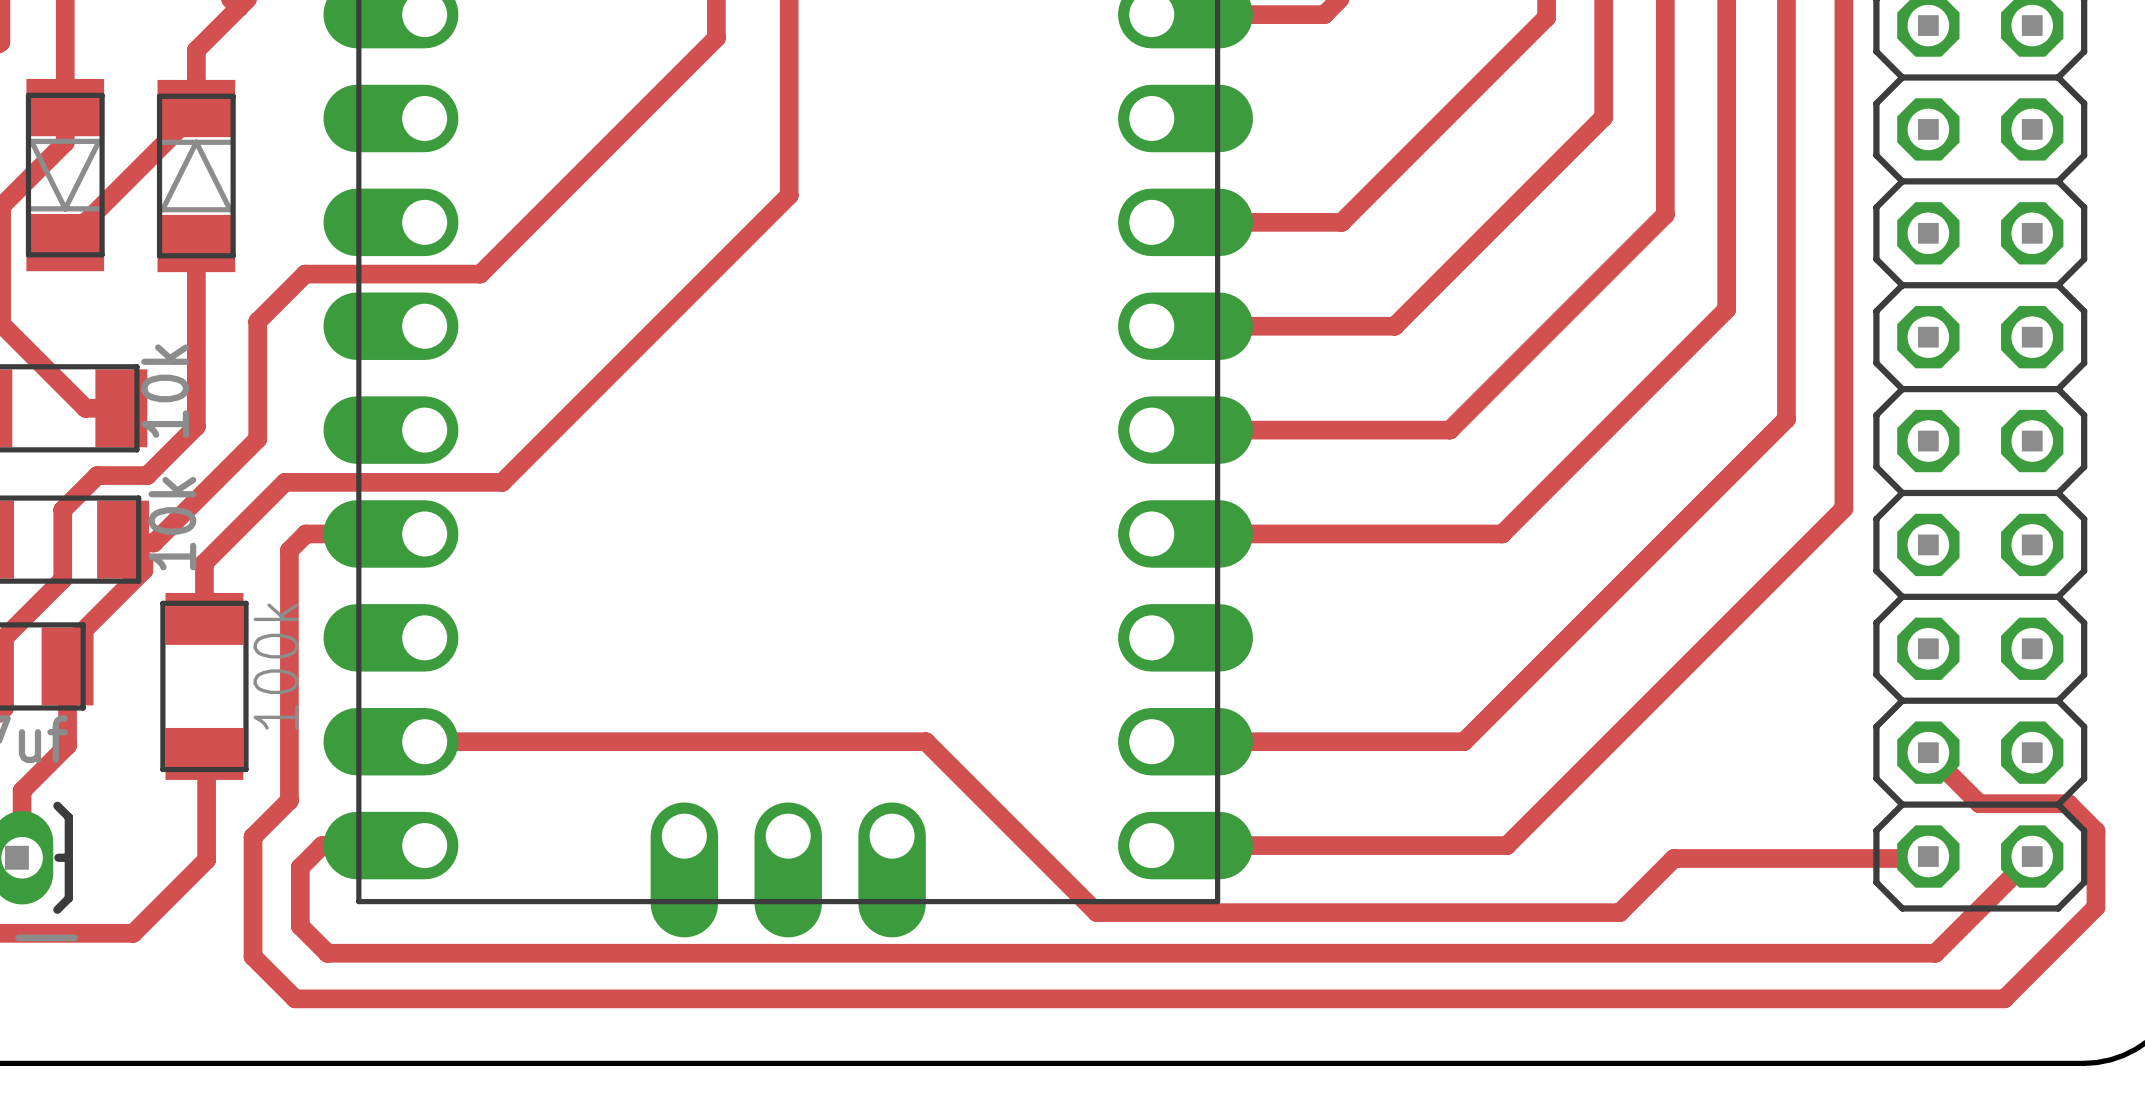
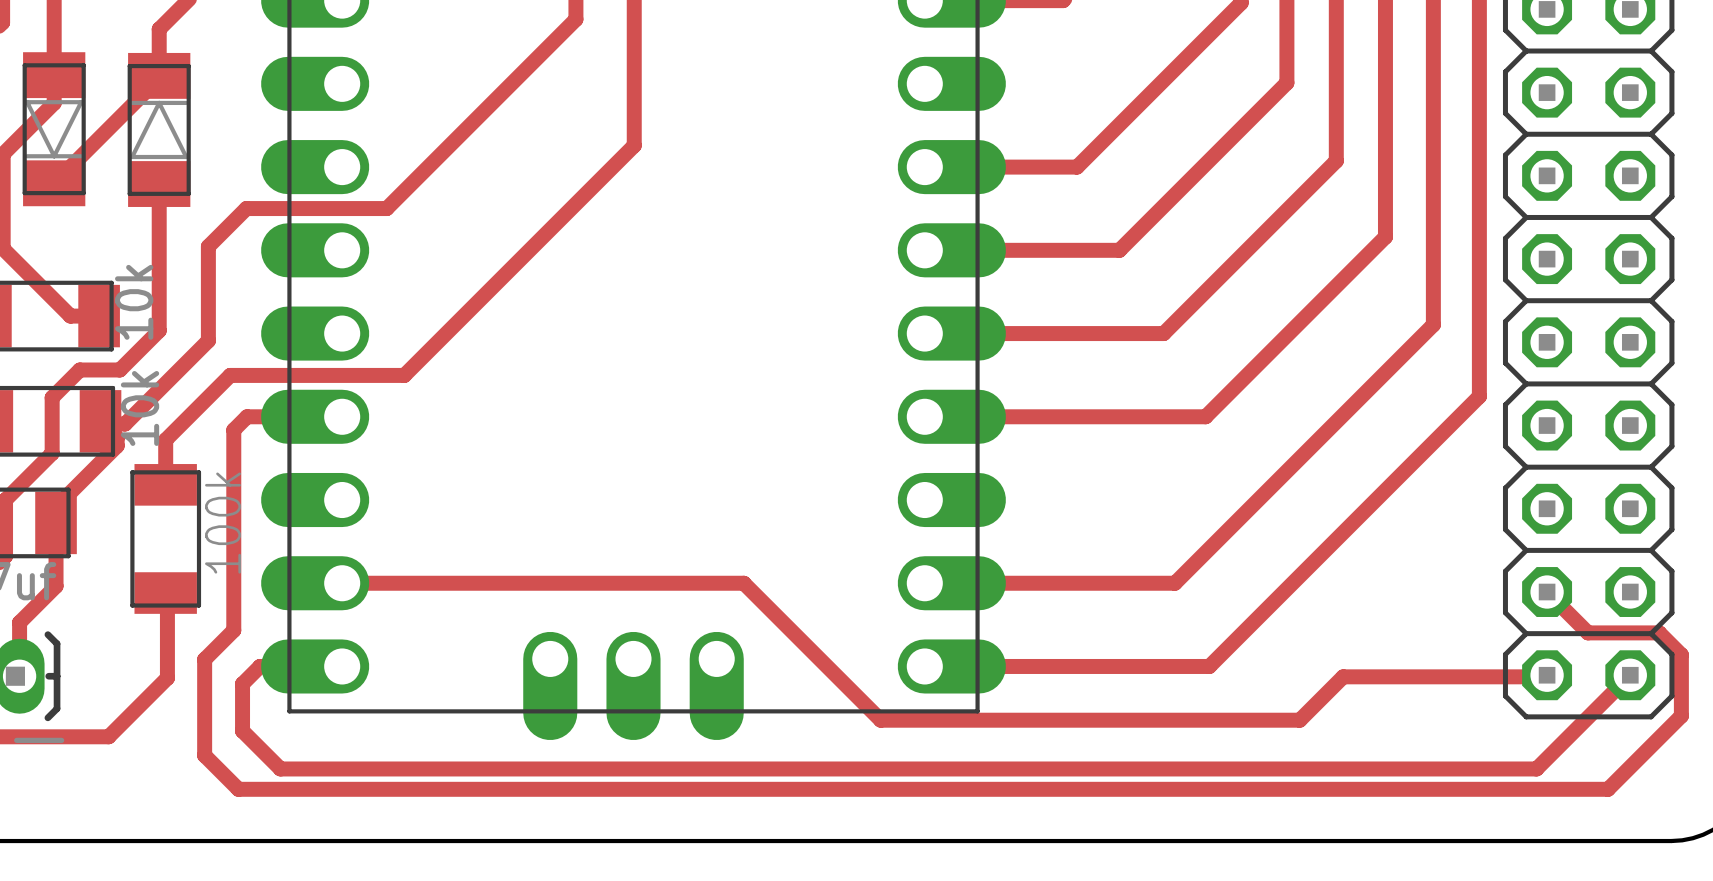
track: (327, 953) (1935, 953) -> (264, 752) (280, 768) (1536, 768) (1552, 752)

